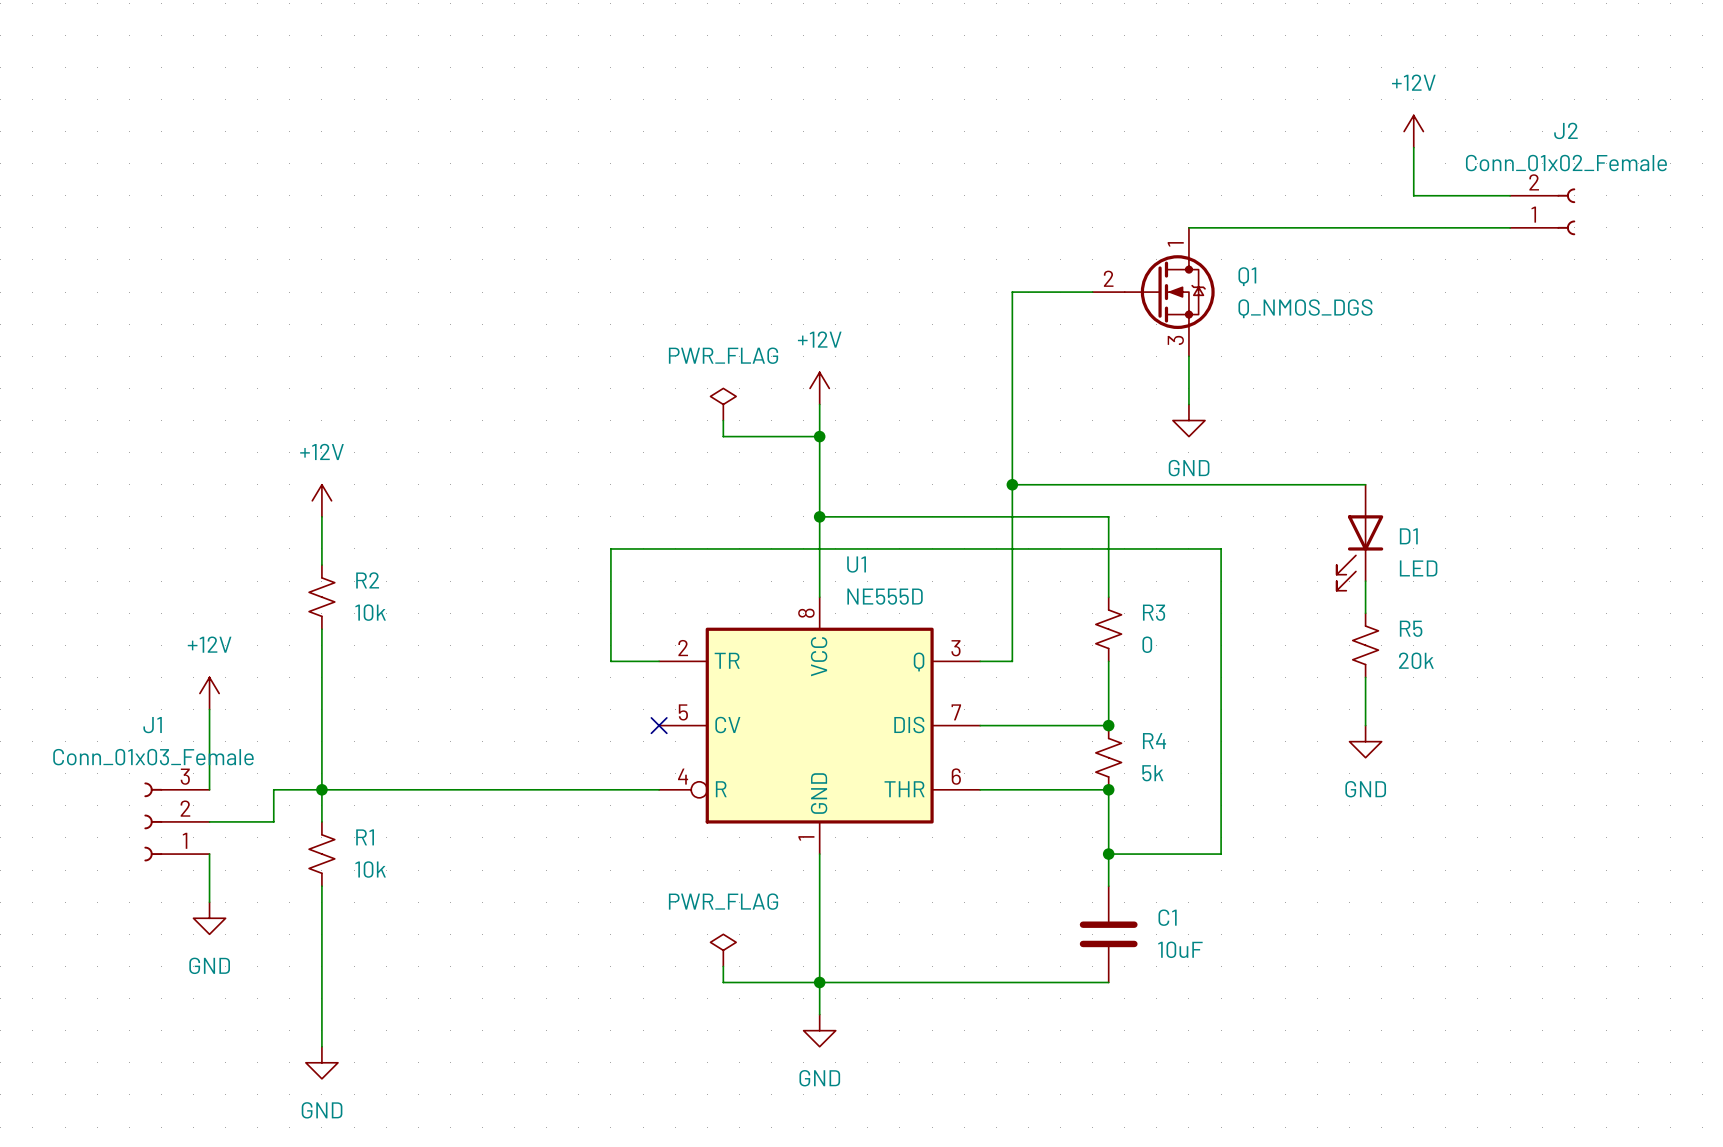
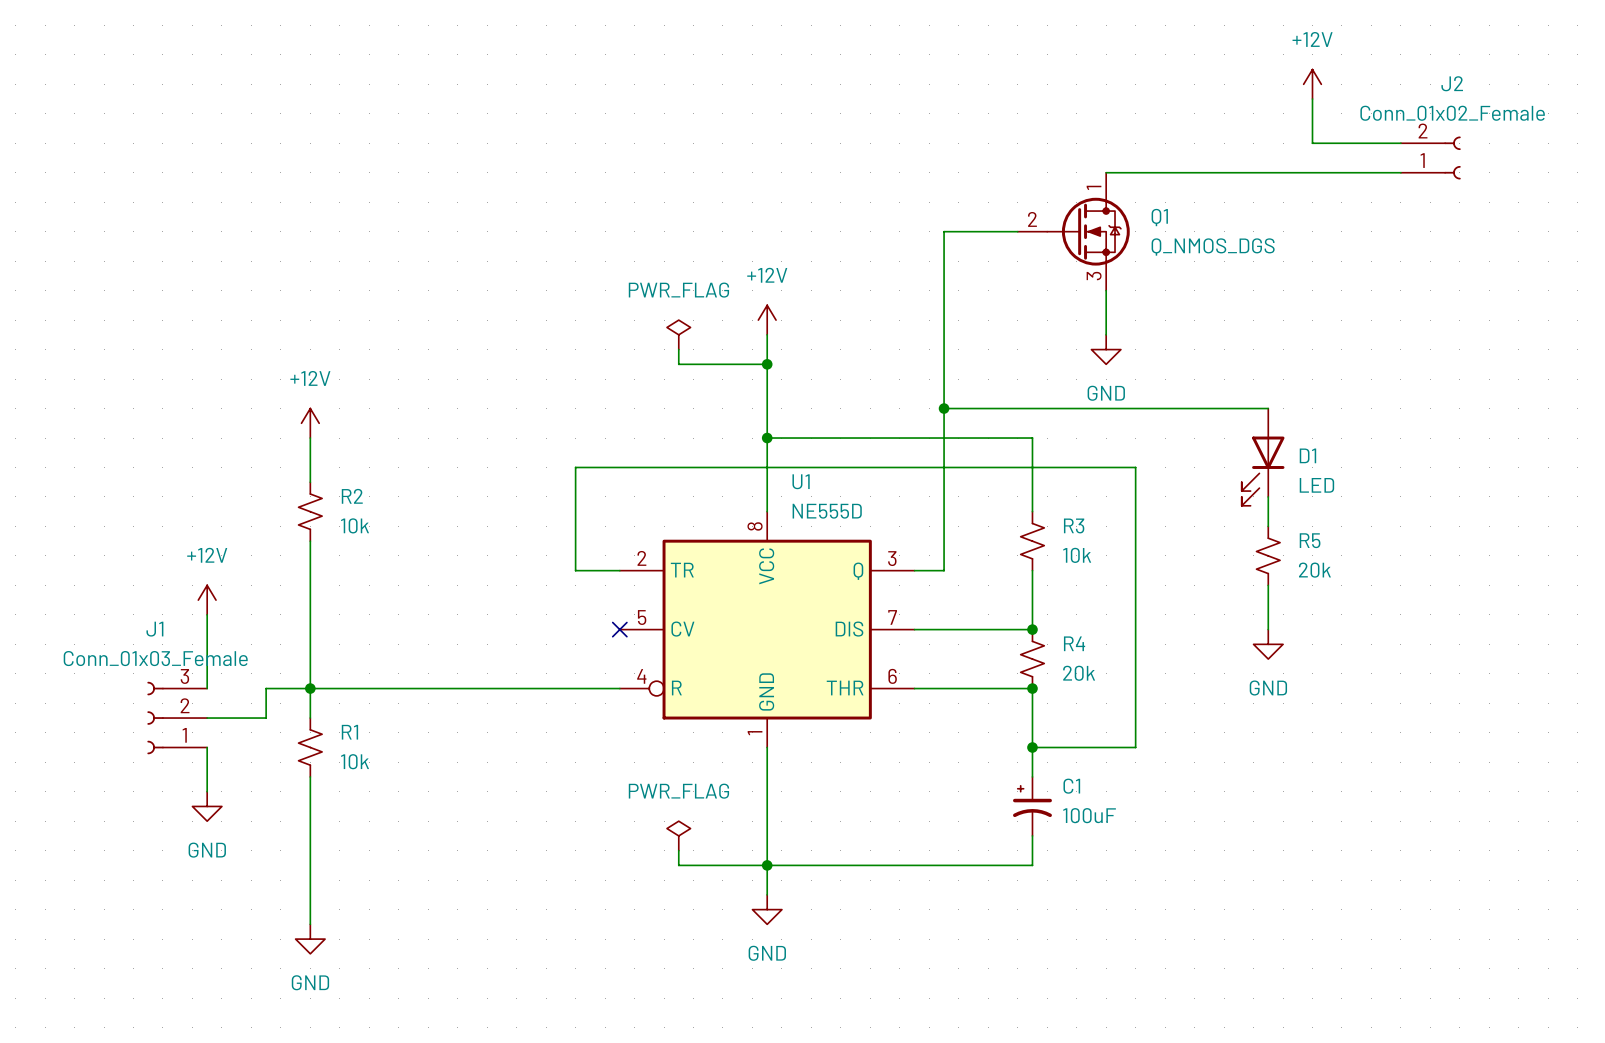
R3 value: 0 (1147, 644) -> 10k (1077, 555)
R4 value: 5k (1152, 773) -> 20k (1079, 673)
C1 symbol: [1079, 886, 1138, 983] -> [1013, 776, 1052, 836]
C1 value: 10uF (1180, 949) -> 100uF (1089, 815)

